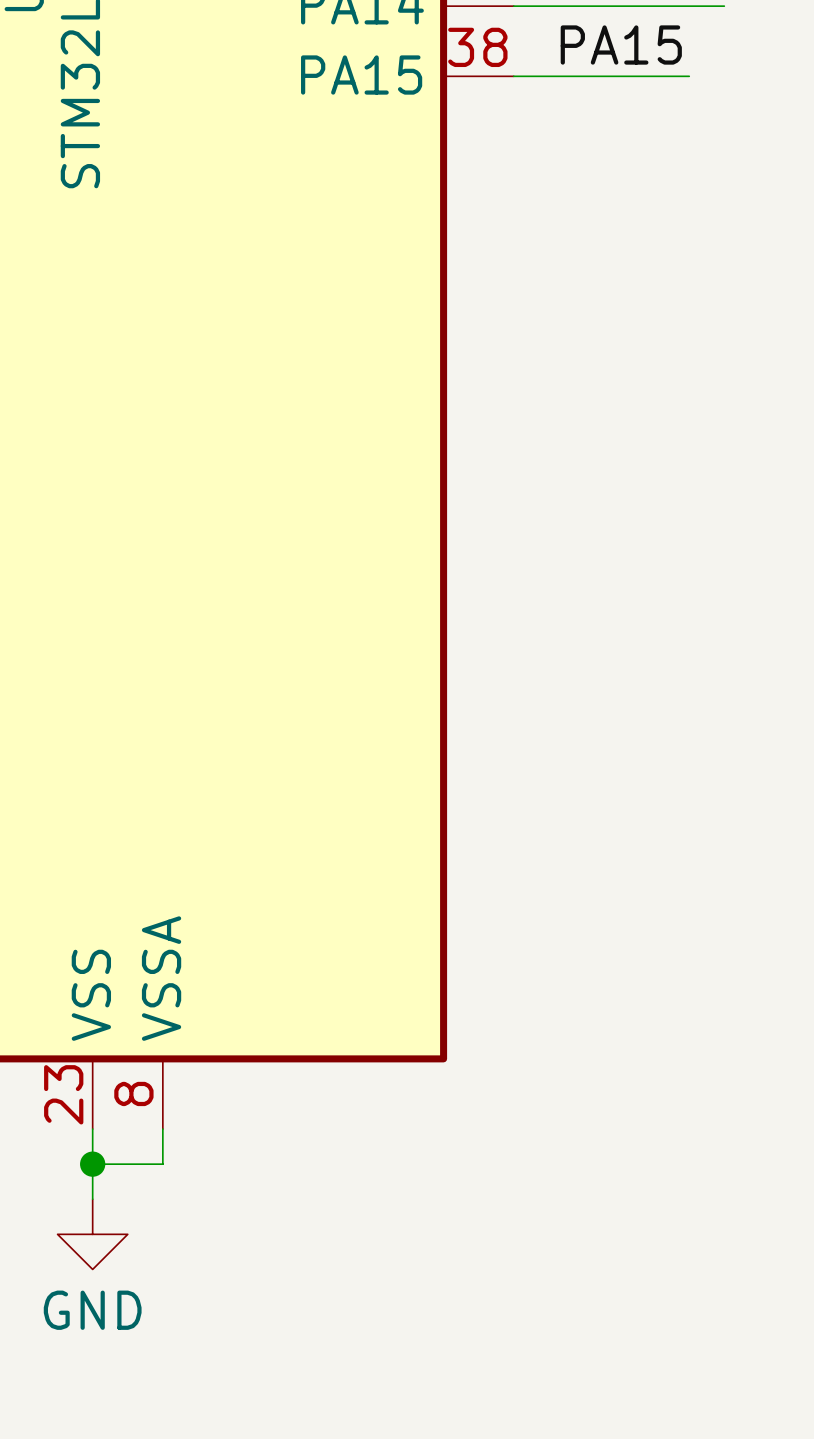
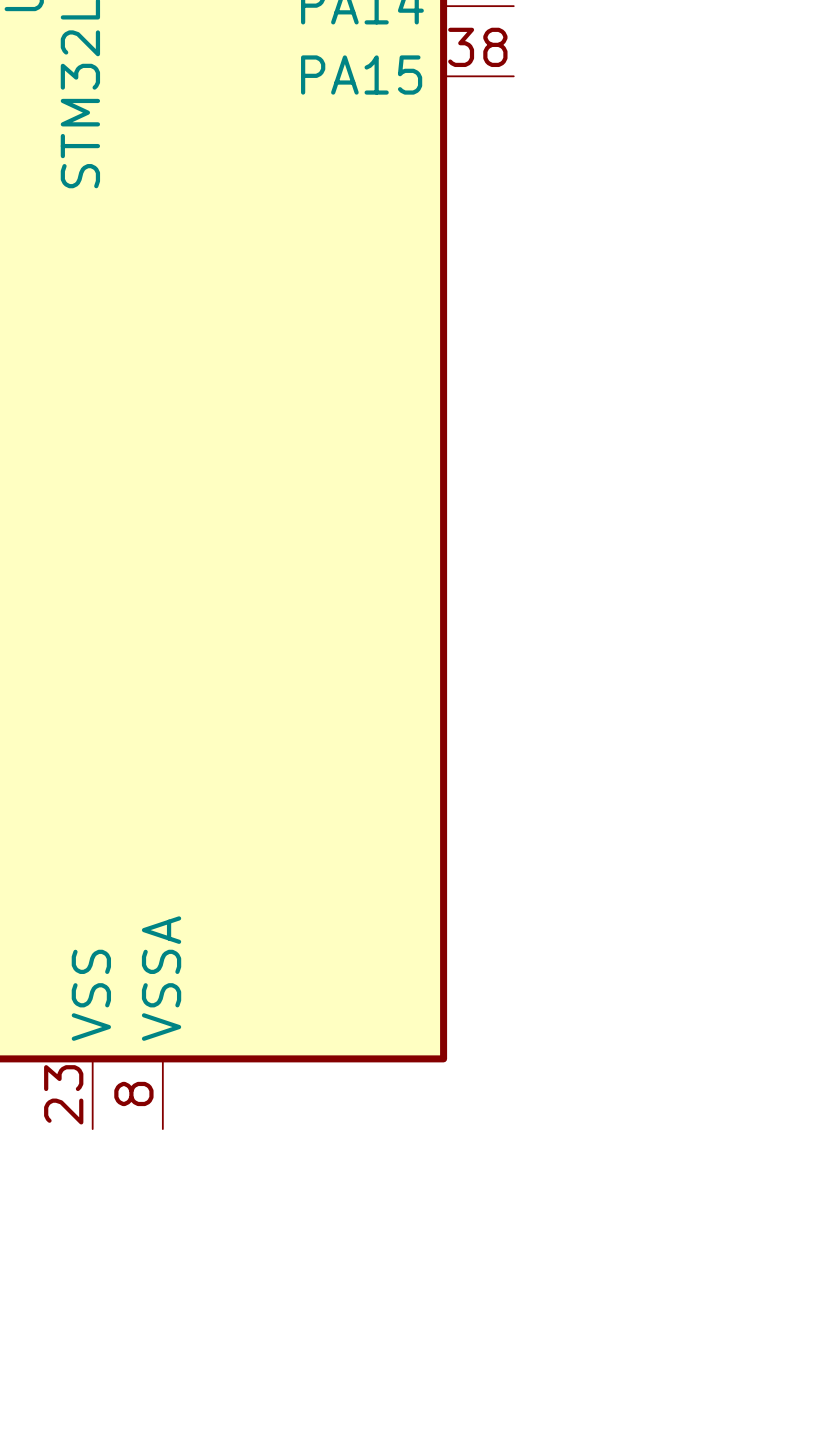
wire: (513, 6) (724, 6) -> none
label: PA15 (621, 45) -> none
wire: (513, 76) (689, 76) -> none
wire: (92, 1129) (92, 1199) -> none
wire: (162, 1129) (162, 1164) (92, 1164) -> none
junction: (92, 1164) -> none
power symbol: GND (92, 1234) -> none

